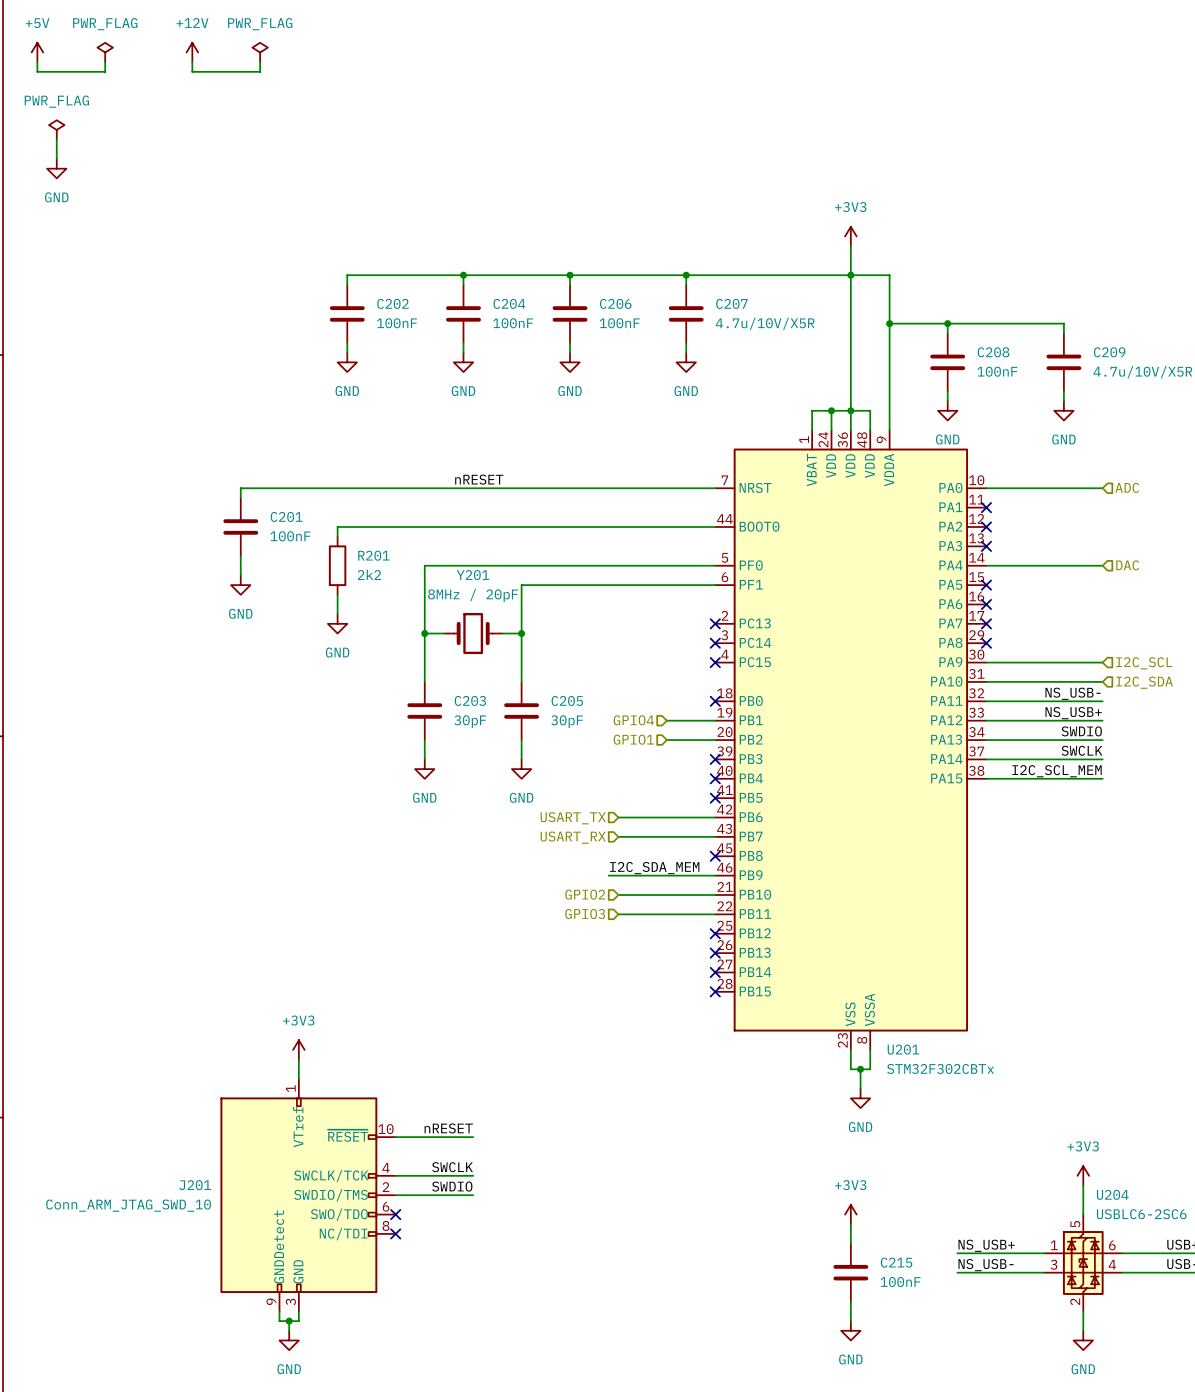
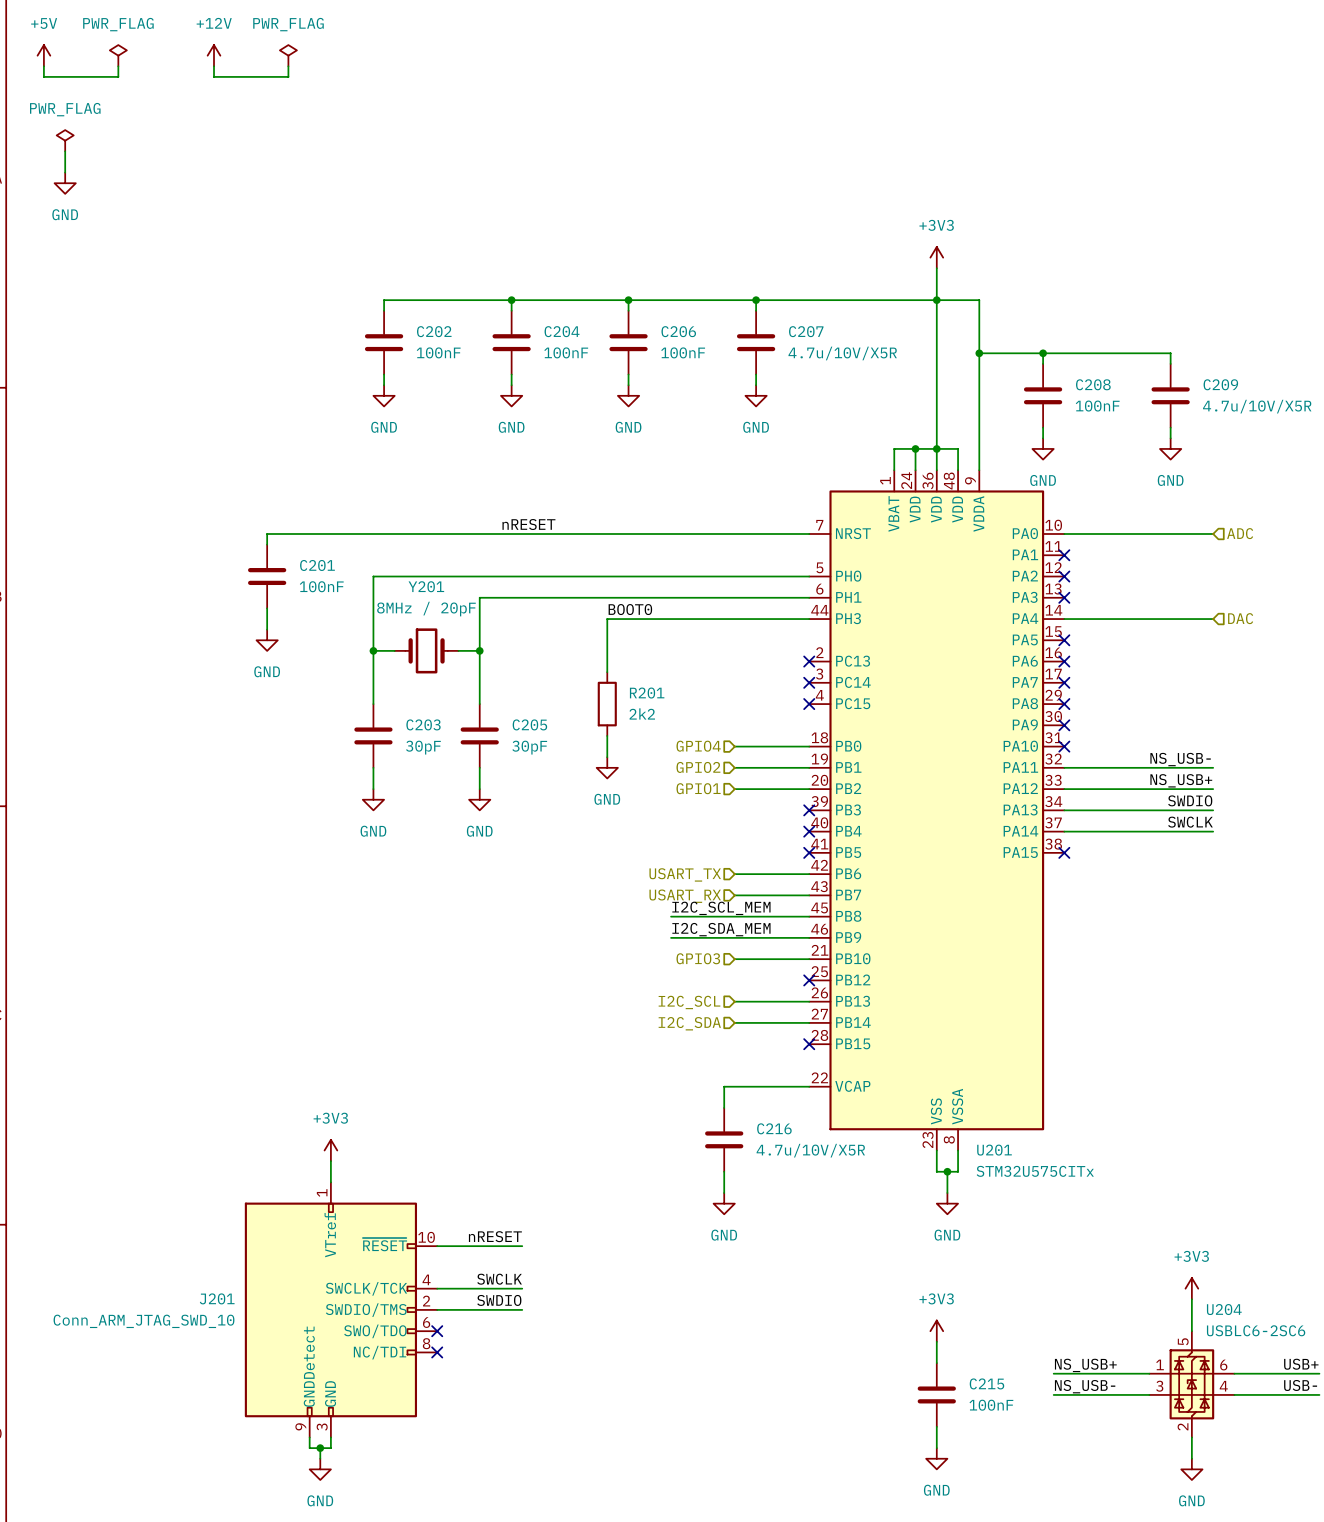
U201 symbol: [715, 430, 987, 1050] -> [809, 470, 1065, 1151]
no-connect mark: none -> (1064, 555)
no-connect mark: (986, 507) -> none
no-connect mark: none -> (1064, 576)
no-connect mark: (986, 527) -> none
wire: none -> (373, 587) (373, 650) (394, 650)
wire: none -> (809, 597) (479, 597) (479, 704)
no-connect mark: none -> (1064, 597)
no-connect mark: (986, 546) -> none
label: none -> BOOT0 (630, 609)
R201 position: (337, 565) -> (607, 704)
wire: (550, 565) (424, 565) (424, 681) -> (607, 619) (607, 672)
wire: (715, 585) (521, 585) (521, 681) -> none
no-connect mark: none -> (1064, 640)
no-connect mark: (986, 585) -> none
junction: none -> (373, 650)
no-connect mark: none -> (809, 661)
no-connect mark: none -> (1064, 661)
no-connect mark: (986, 604) -> none
wire: none -> (373, 672) (373, 704)
power symbol: GND (337, 623) -> none
no-connect mark: (715, 623) -> none
no-connect mark: none -> (809, 682)
no-connect mark: none -> (1064, 682)
no-connect mark: (986, 623) -> none
wire: (424, 633) (444, 633) -> none
junction position: (424, 633) -> (479, 650)
Y201 position: (473, 633) -> (426, 650)
wire: (502, 633) (521, 633) -> (458, 650) (479, 650)
junction: (521, 633) -> none
no-connect mark: (715, 643) -> none
no-connect mark: none -> (809, 704)
no-connect mark: none -> (1064, 704)
no-connect mark: (986, 643) -> none
no-connect mark: (715, 662) -> none
no-connect mark: none -> (1064, 725)
wire: (986, 662) (1102, 662) -> none
hierarchical label: I2C_SCL (1144, 663) -> none
wire: none -> (607, 735) (607, 757)
hierarchical label: none -> GPIO4 (698, 746)
wire: none -> (734, 746) (809, 746)
no-connect mark: none -> (1064, 746)
wire: (986, 681) (1102, 681) -> none
hierarchical label: I2C_SDA (1144, 682) -> none
hierarchical label: none -> GPIO2 (698, 767)
power symbol: none -> GND (607, 767)
wire: none -> (734, 767) (809, 767)
no-connect mark: (715, 701) -> none
C203 position: (424, 711) -> (373, 735)
C205 position: (521, 711) -> (479, 735)
hierarchical label: GPIO4 (633, 720) -> GPIO1 (698, 788)
power symbol: none -> GND (373, 799)
hierarchical label: GPIO1 (633, 739) -> none
wire: (424, 740) (424, 759) -> (373, 767) (373, 789)
wire: (521, 740) (521, 759) -> (479, 767) (479, 789)
wire: (666, 740) (715, 740) -> none
no-connect mark: none -> (809, 810)
no-connect mark: (715, 759) -> none
no-connect mark: none -> (809, 831)
power symbol position: GND (424, 769) -> GND (479, 799)
power symbol: GND (521, 769) -> none
label: I2C_SCL_MEM (1056, 771) -> none
no-connect mark: (715, 778) -> none
no-connect mark: none -> (809, 852)
no-connect mark: none -> (1064, 852)
wire: (986, 778) (1102, 778) -> none
wire: none -> (734, 874) (809, 874)
no-connect mark: (715, 798) -> none
wire: (618, 817) (666, 817) -> none
hierarchical label position: USART_TX (573, 818) -> USART_TX (685, 874)
label: none -> I2C_SCL_MEM (721, 908)
wire: none -> (671, 916) (681, 916)
hierarchical label position: USART_RX (573, 837) -> USART_RX (685, 896)
wire: none -> (671, 937) (809, 937)
no-connect mark: (715, 856) -> none
label position: I2C_SDA_MEM (654, 868) -> I2C_SDA_MEM (721, 929)
wire: (608, 875) (666, 875) -> none
hierarchical label: GPIO2 (585, 894) -> none
wire: (618, 895) (715, 895) -> none
no-connect mark: none -> (809, 980)
hierarchical label position: GPIO3 (585, 914) -> GPIO3 (698, 958)
wire: (618, 914) (666, 914) -> none
hierarchical label: none -> I2C_SCL (689, 1002)
wire: none -> (734, 1022) (809, 1022)
no-connect mark: (715, 933) -> none
hierarchical label: none -> I2C_SDA (689, 1023)
no-connect mark: (715, 953) -> none
no-connect mark: none -> (809, 1044)
no-connect mark: (715, 972) -> none
no-connect mark: (715, 991) -> none
wire: none -> (809, 1086) (724, 1086) (724, 1107)
C216: none -> 4.7u/10V/X5R (724, 1139)
U201 value: STM32F302CBTx (940, 1068) -> STM32U575CITx (1035, 1171)
wire: none -> (724, 1171) (724, 1193)
power symbol: none -> GND (724, 1203)

